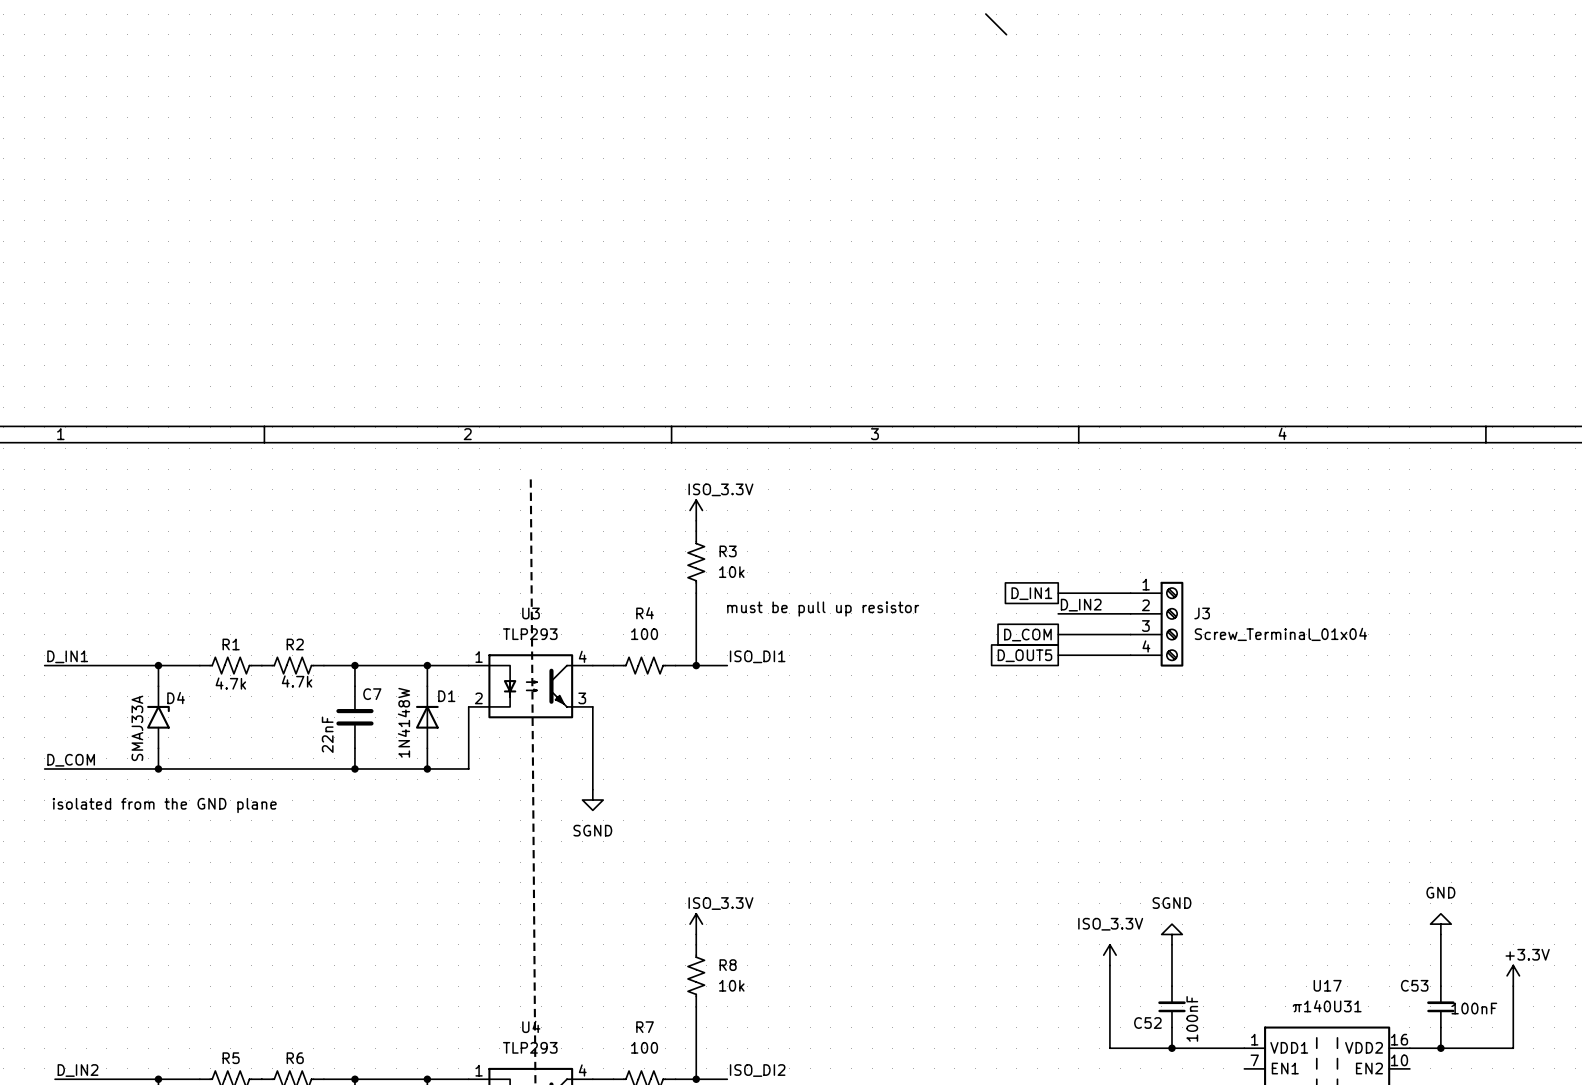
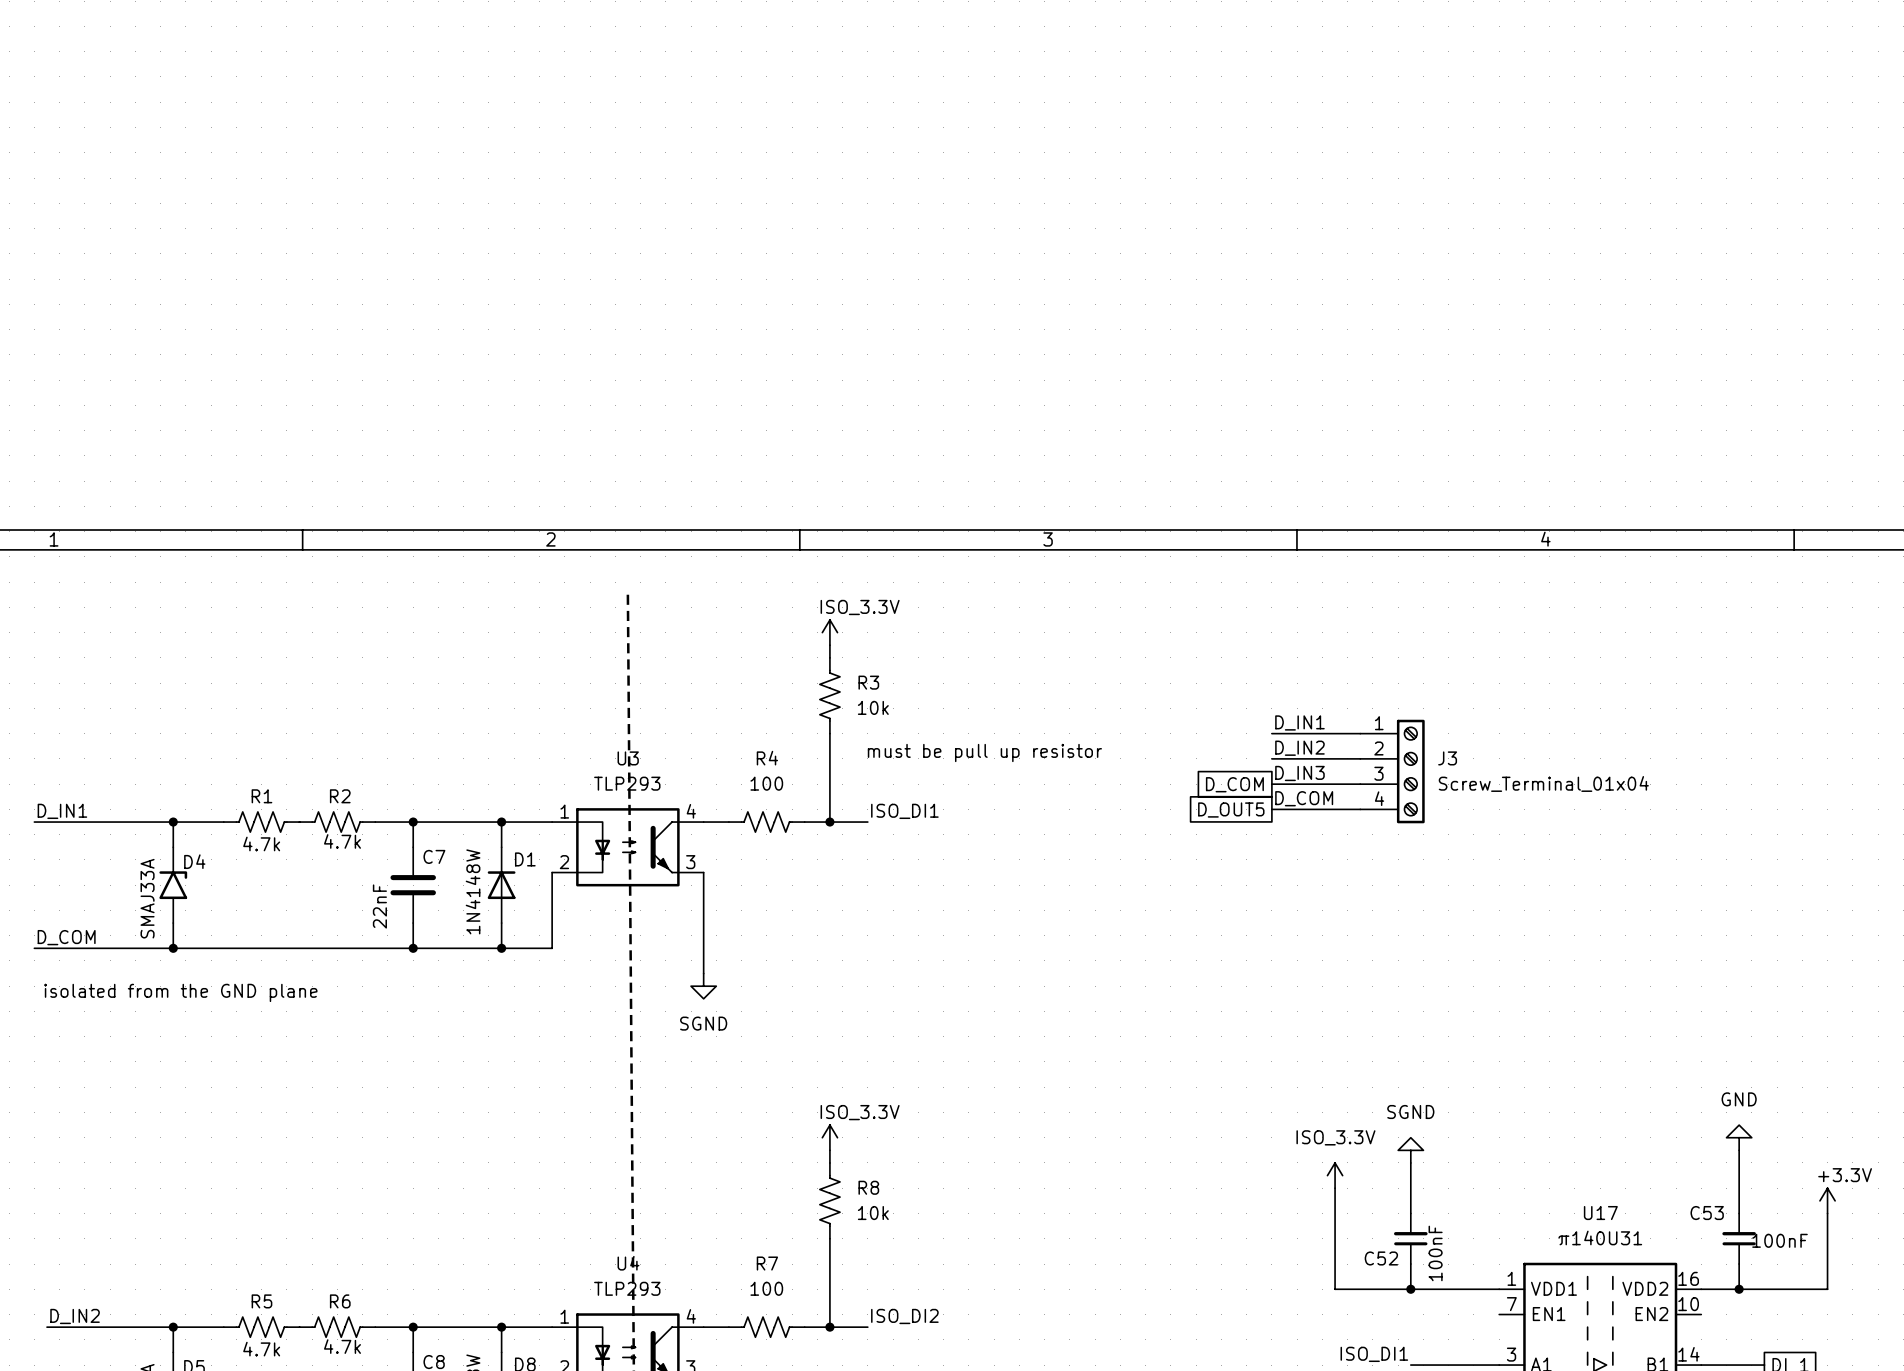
wire: (985, 14) (1006, 34) -> none
label: none -> D_IN1 (1299, 722)
global label: D_IN1 (1031, 593) -> none
label: none -> D_IN3 (1299, 773)
label: none -> D_COM (1304, 798)

